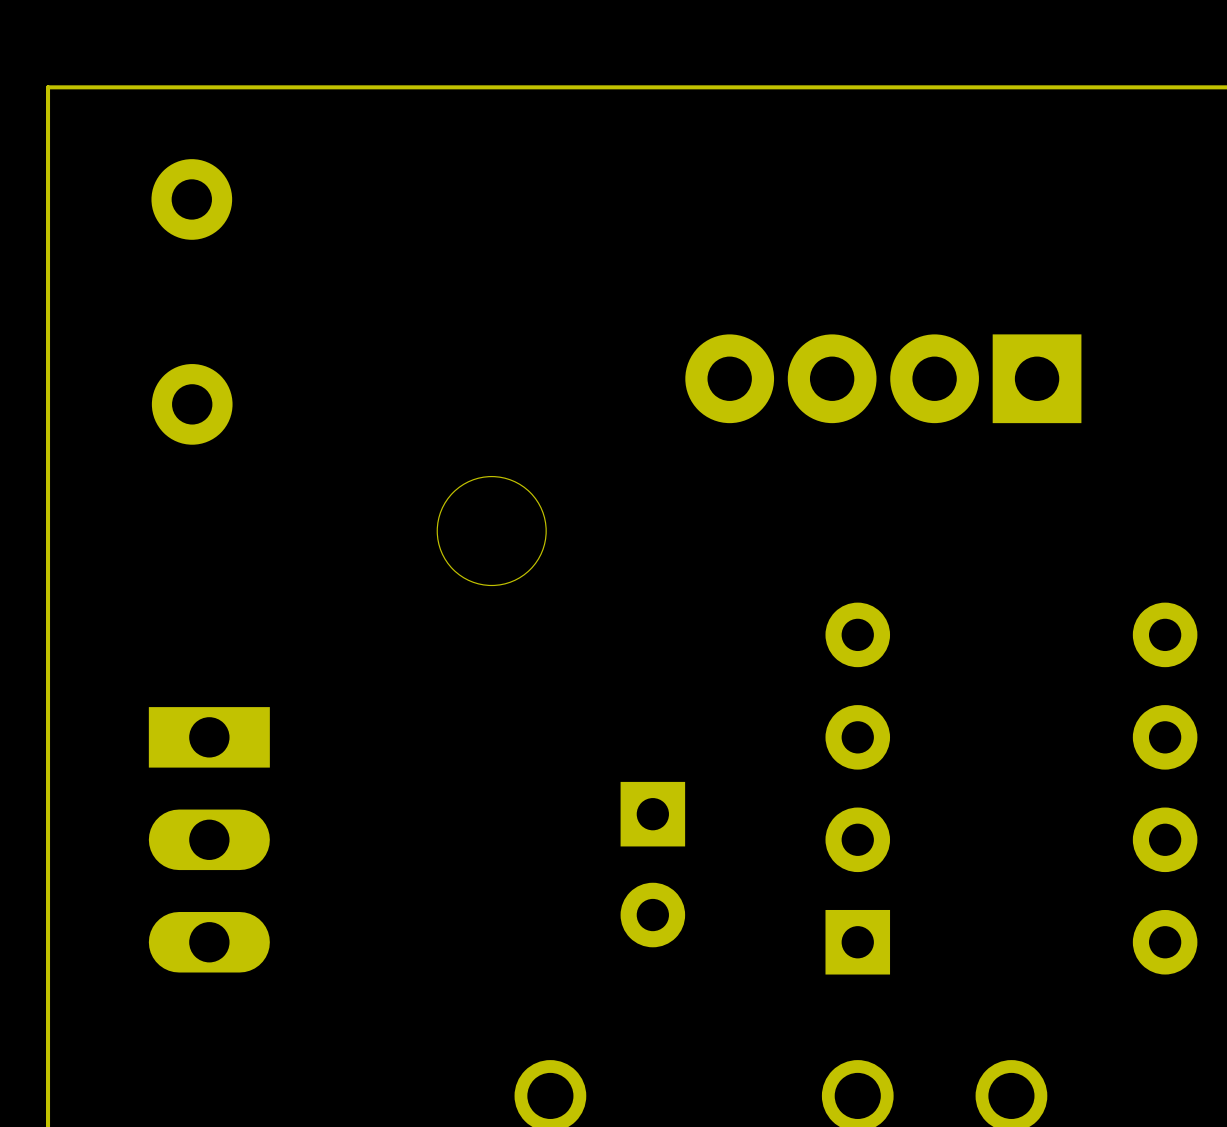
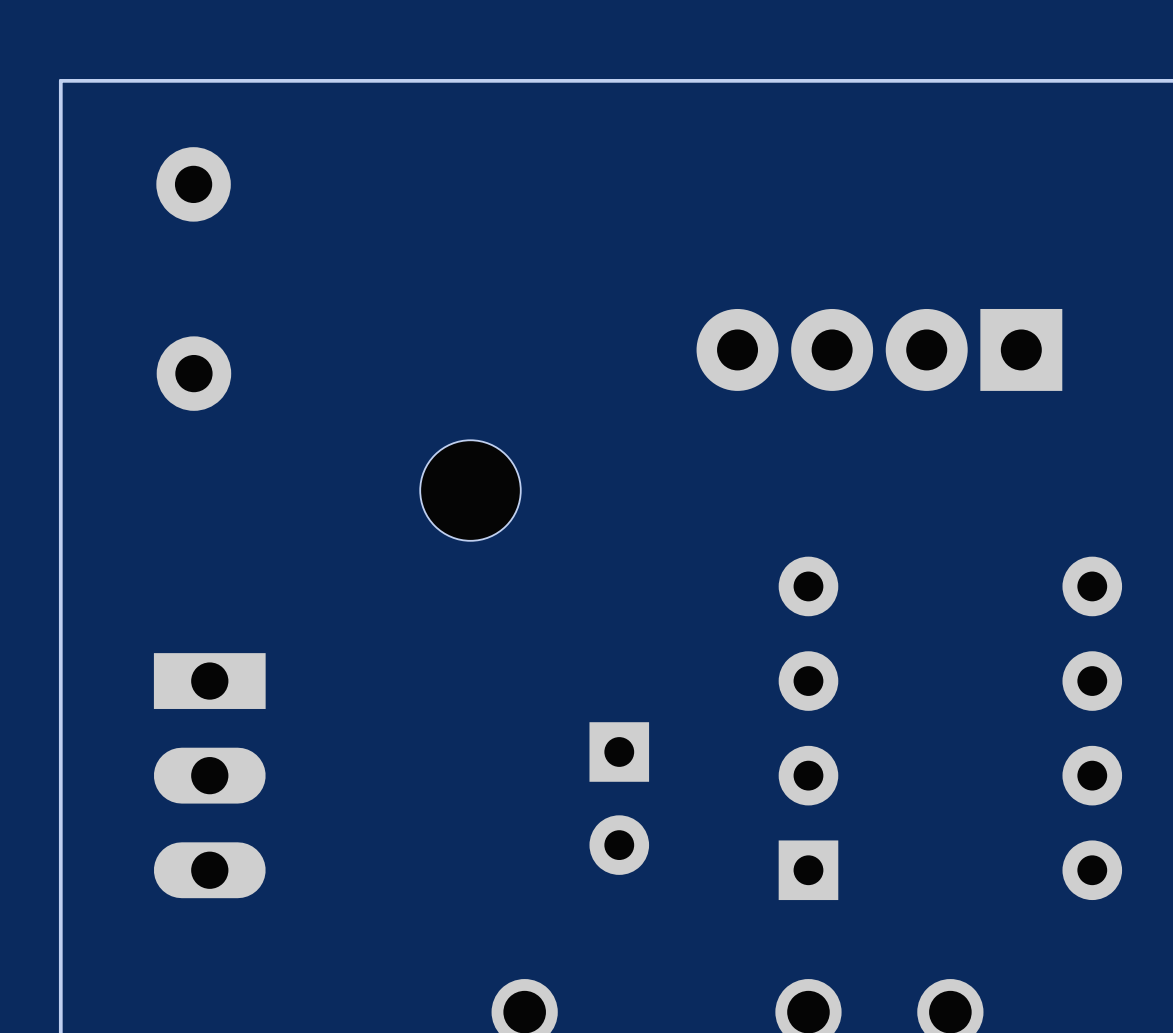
part position: (883, 378) -> (879, 349)

